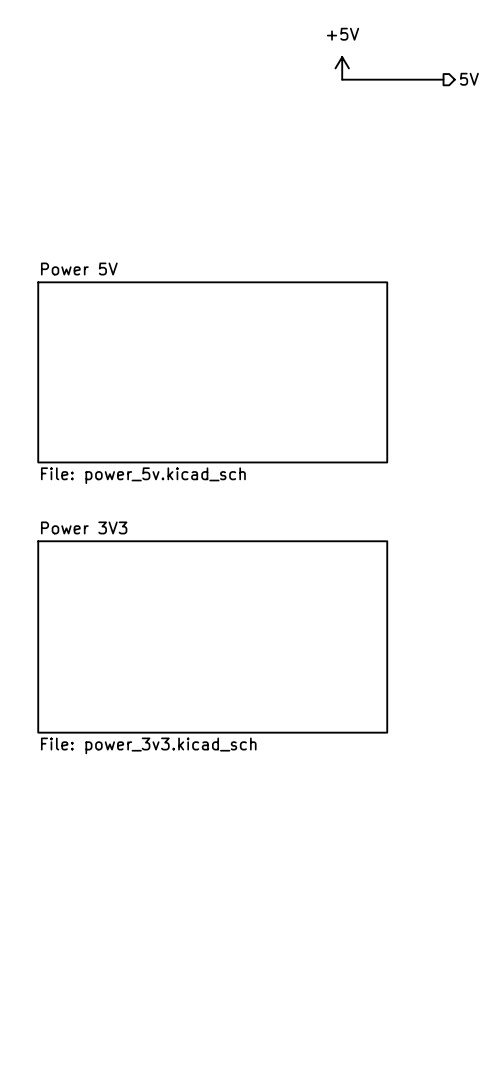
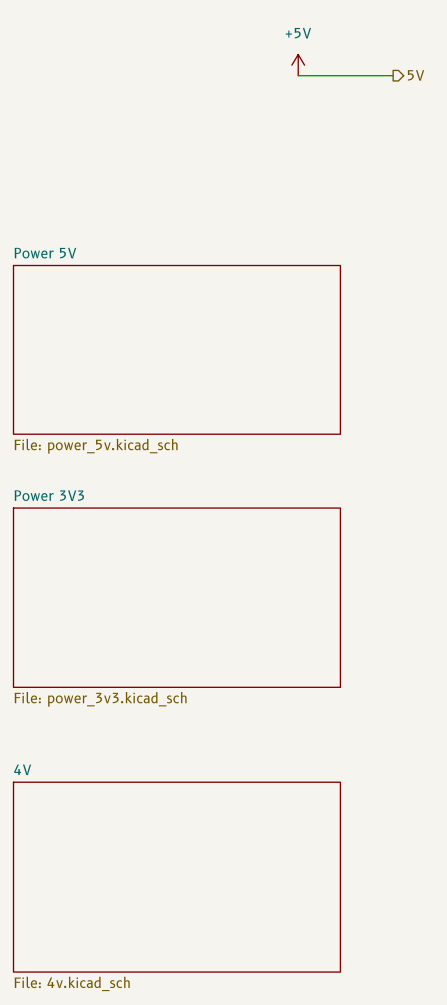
sheet 4V: none -> File: 4v.kicad_sch (176, 877)

